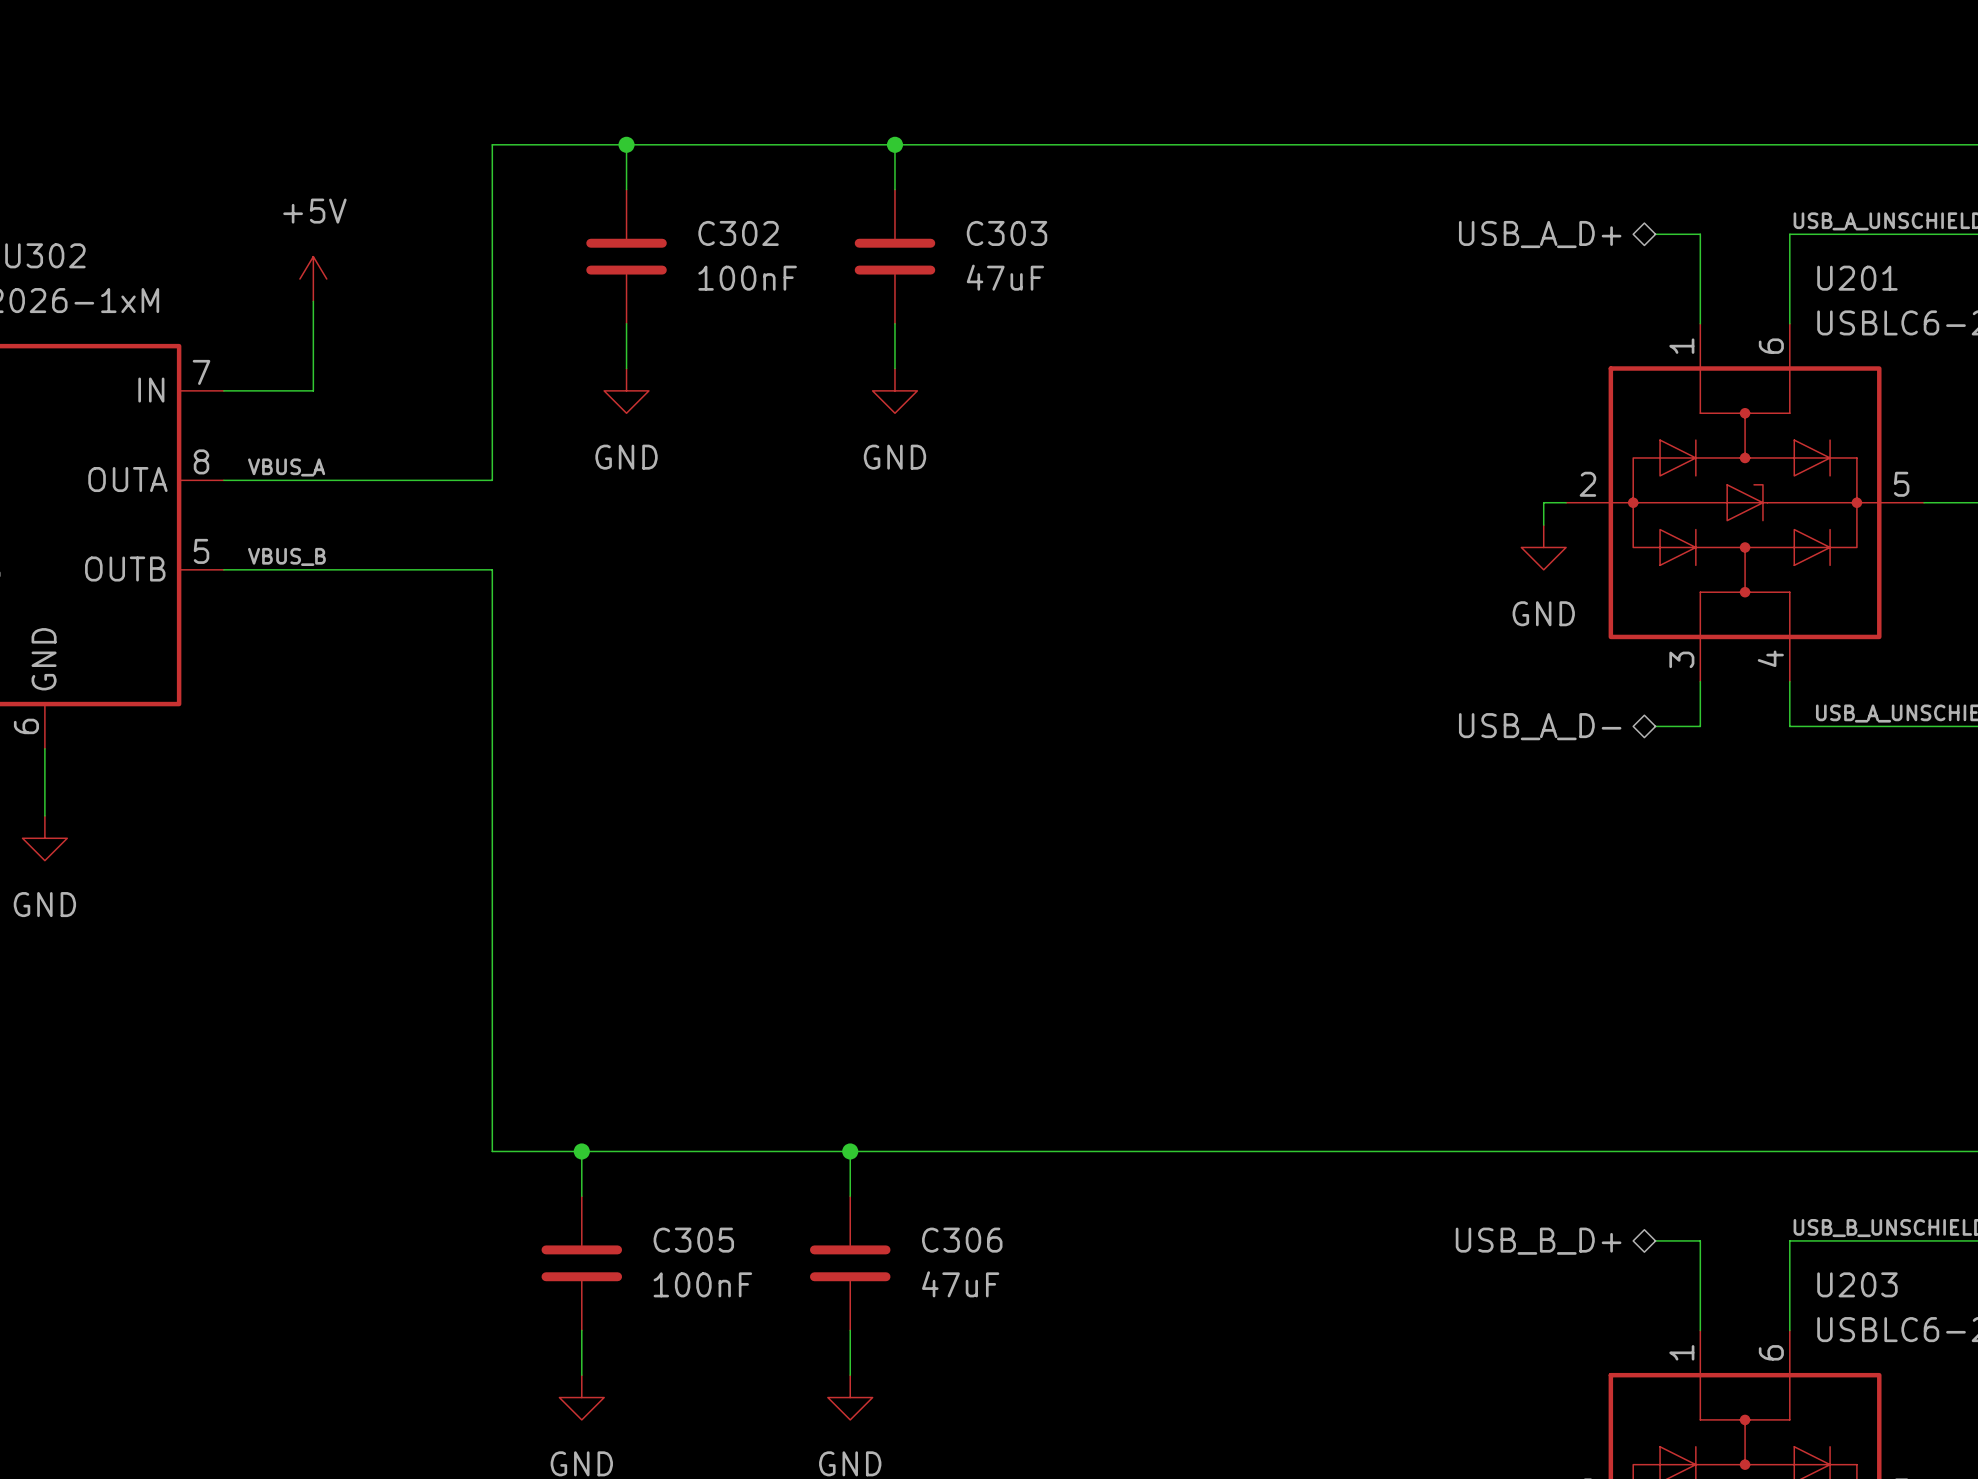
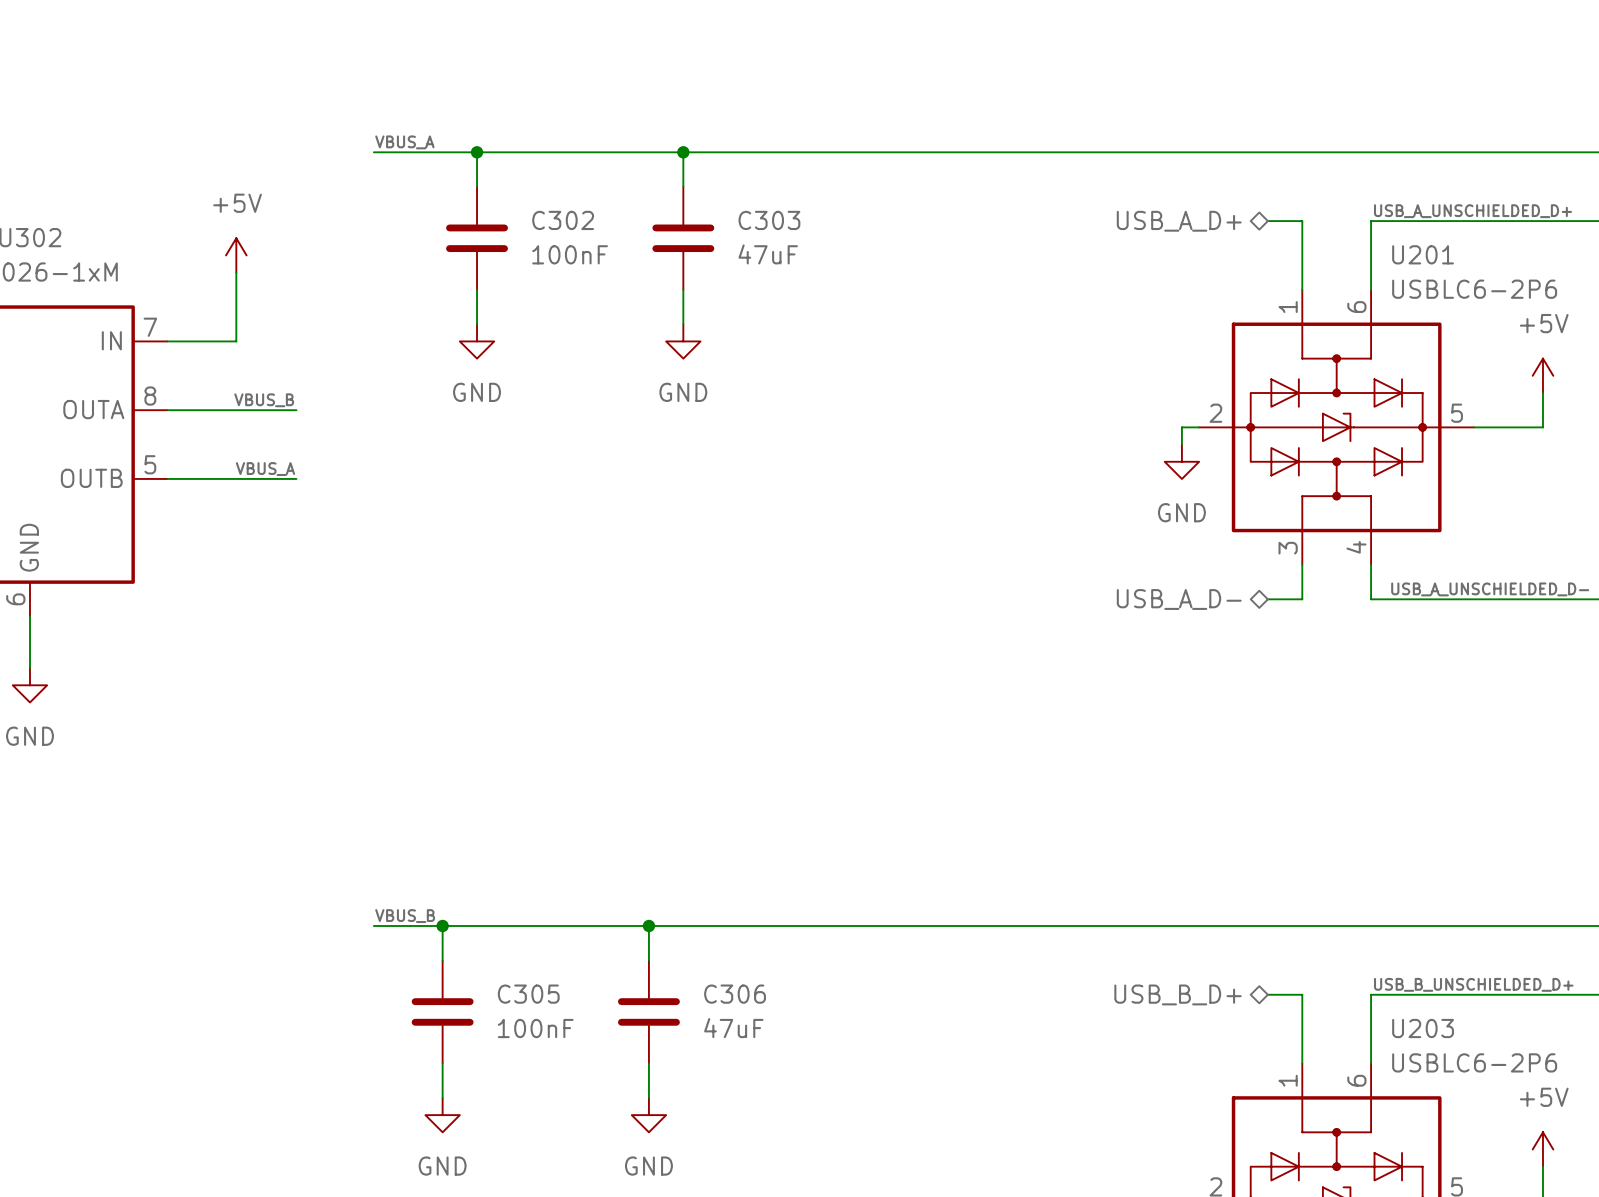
label: none -> VBUS_A (404, 142)
wire: (492, 144) (492, 480) (391, 480) -> none
label position: VBUS_A (286, 467) -> VBUS_A (265, 469)
label position: VBUS_B (286, 556) -> VBUS_B (264, 400)
wire: (391, 569) (492, 569) (492, 1151) -> none
label: none -> VBUS_B (405, 916)

